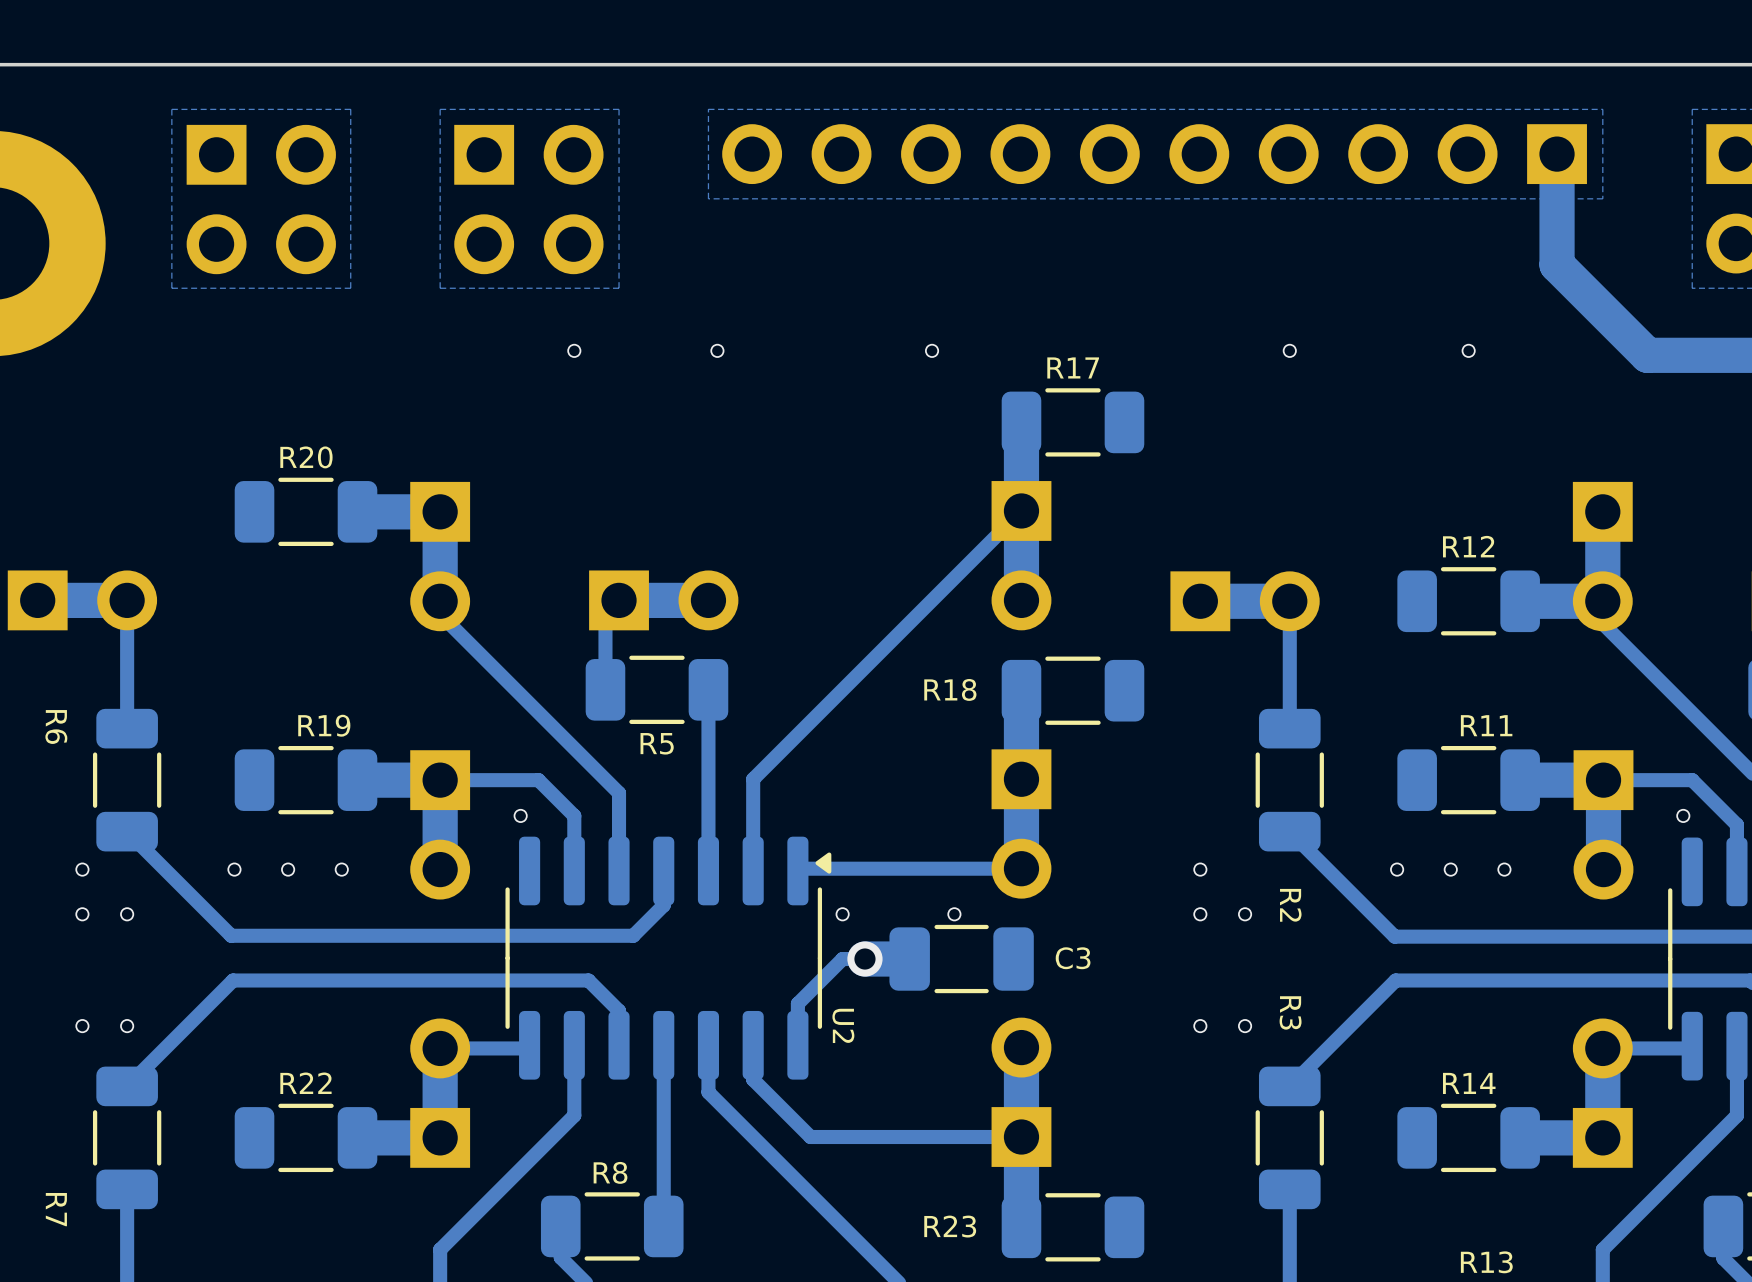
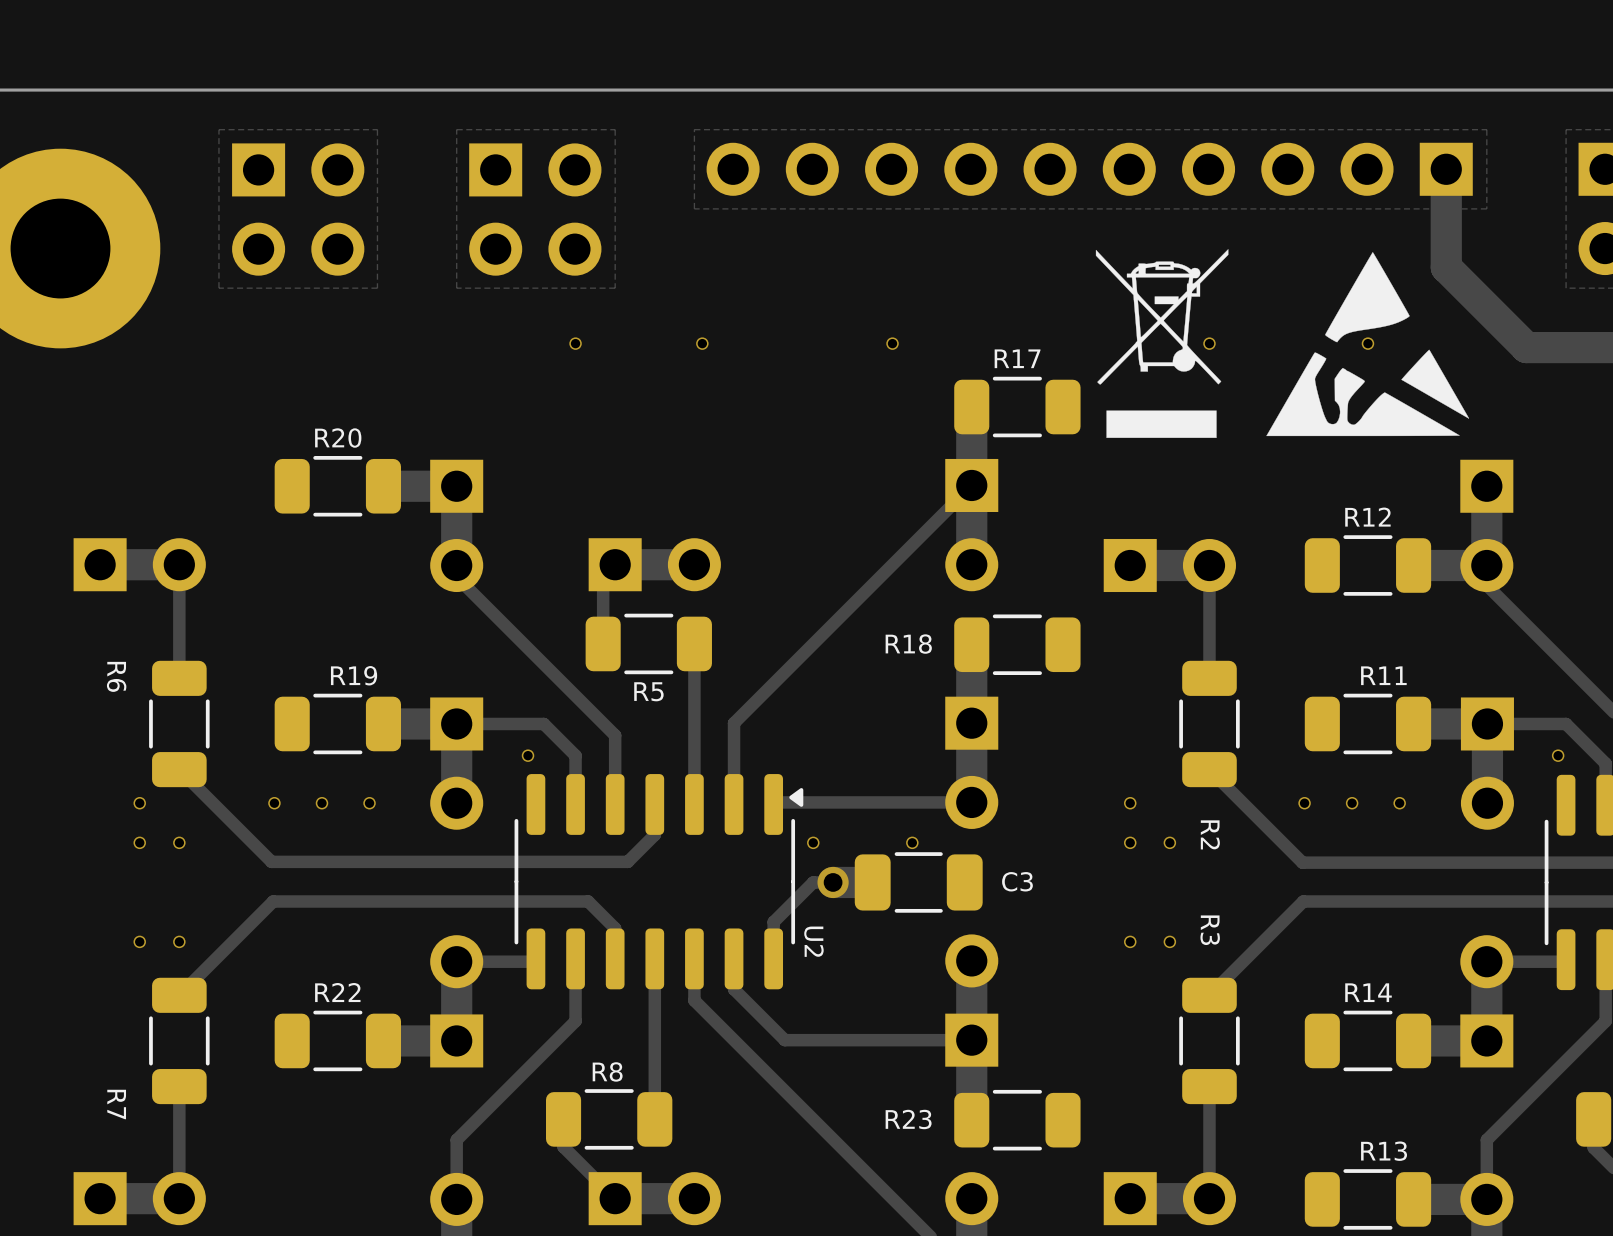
drawing: none -> [1095, 249, 1229, 438]
drawing: none -> [1266, 252, 1470, 437]

